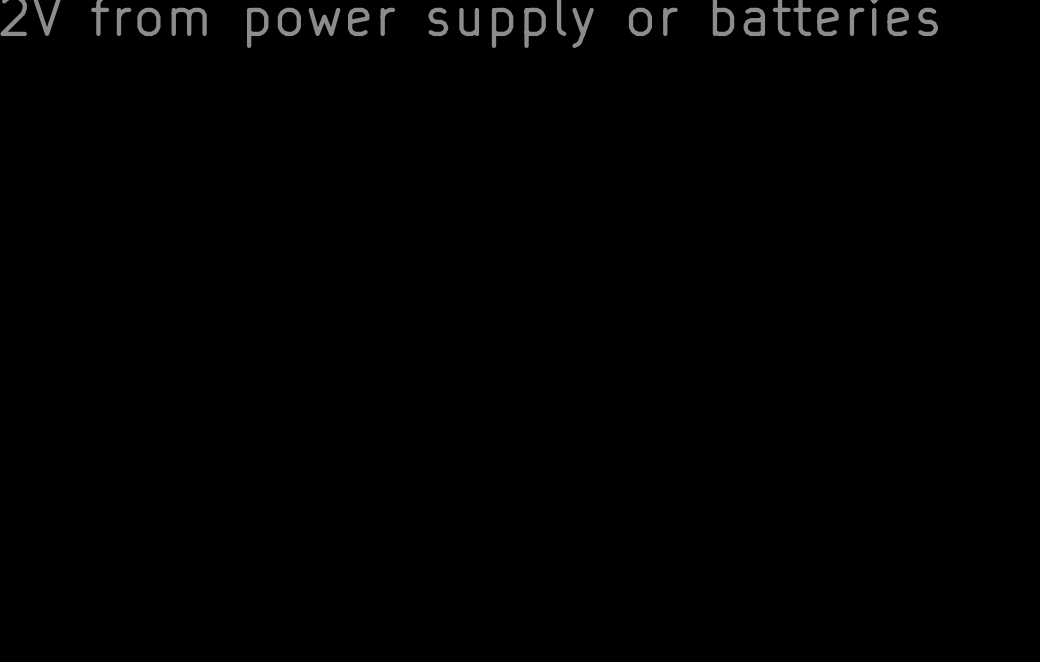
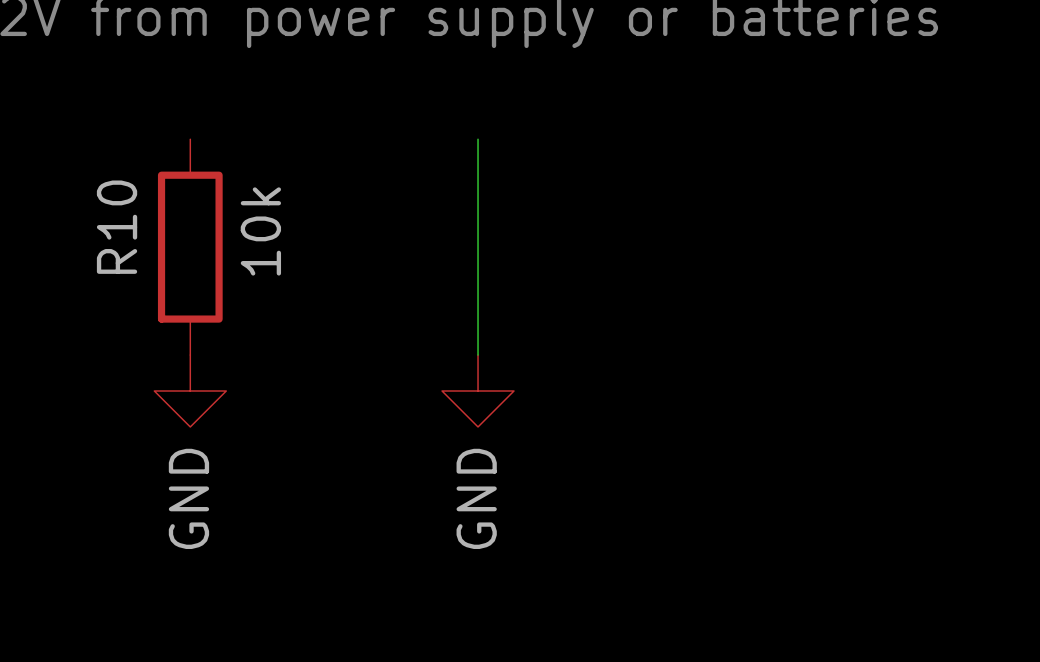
wire: none -> (478, 139) (478, 355)
R10: none -> 10k (190, 247)
power symbol: none -> GND (190, 391)
power symbol: none -> GND (478, 391)

